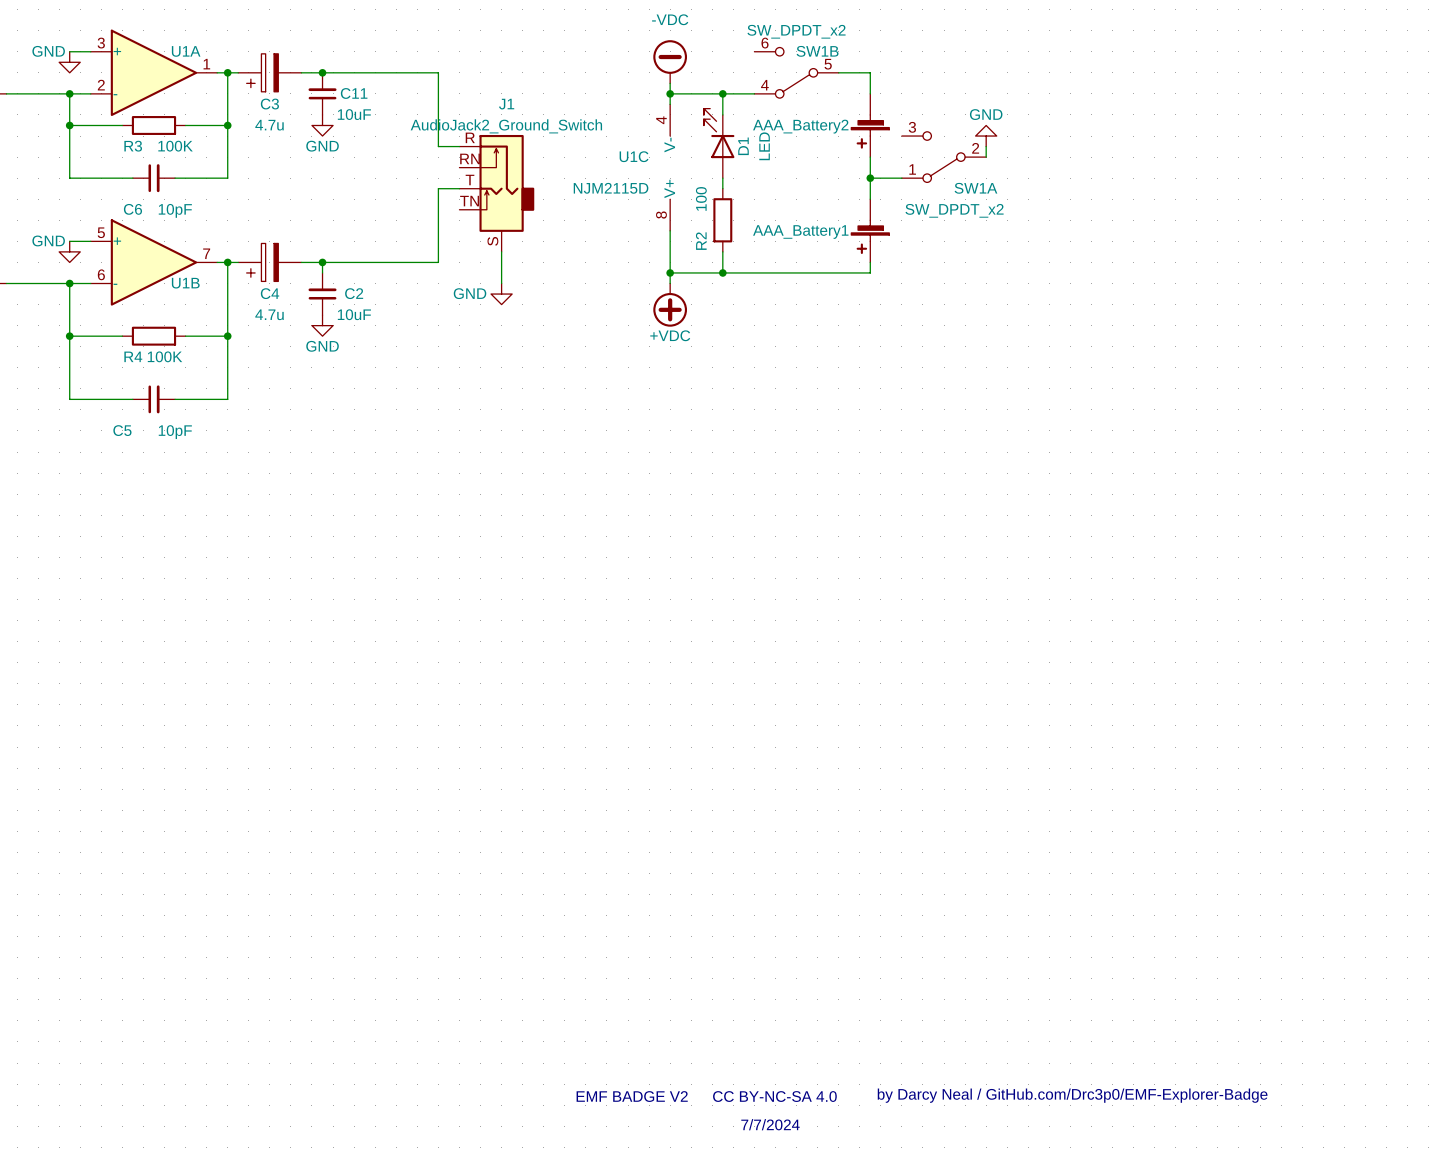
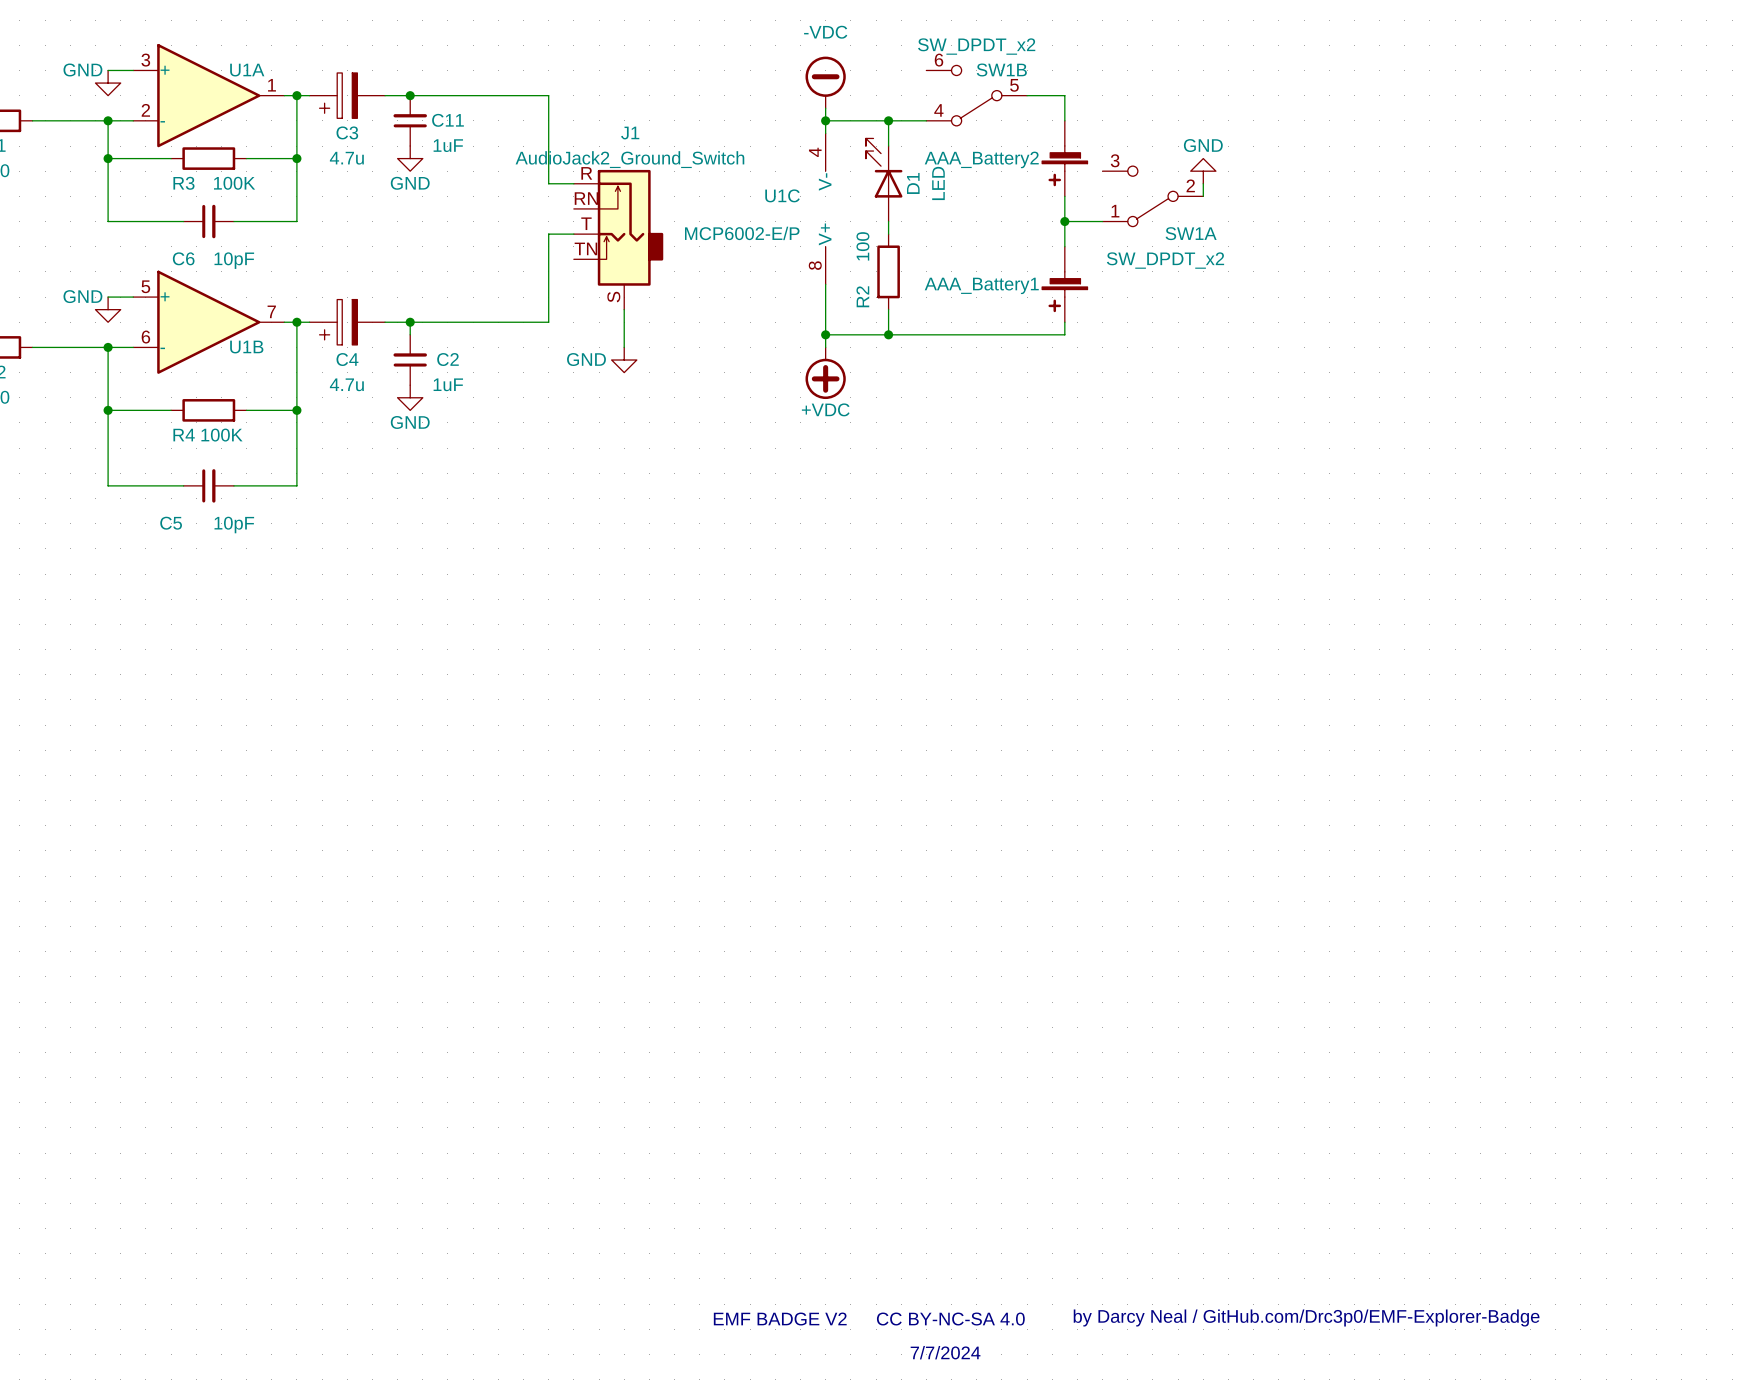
C11 value: 10uF (354, 114) -> 1uF (448, 145)
U1C value: NJM2115D (611, 188) -> MCP6002-E/P (742, 233)
C2 value: 10uF (354, 314) -> 1uF (448, 384)

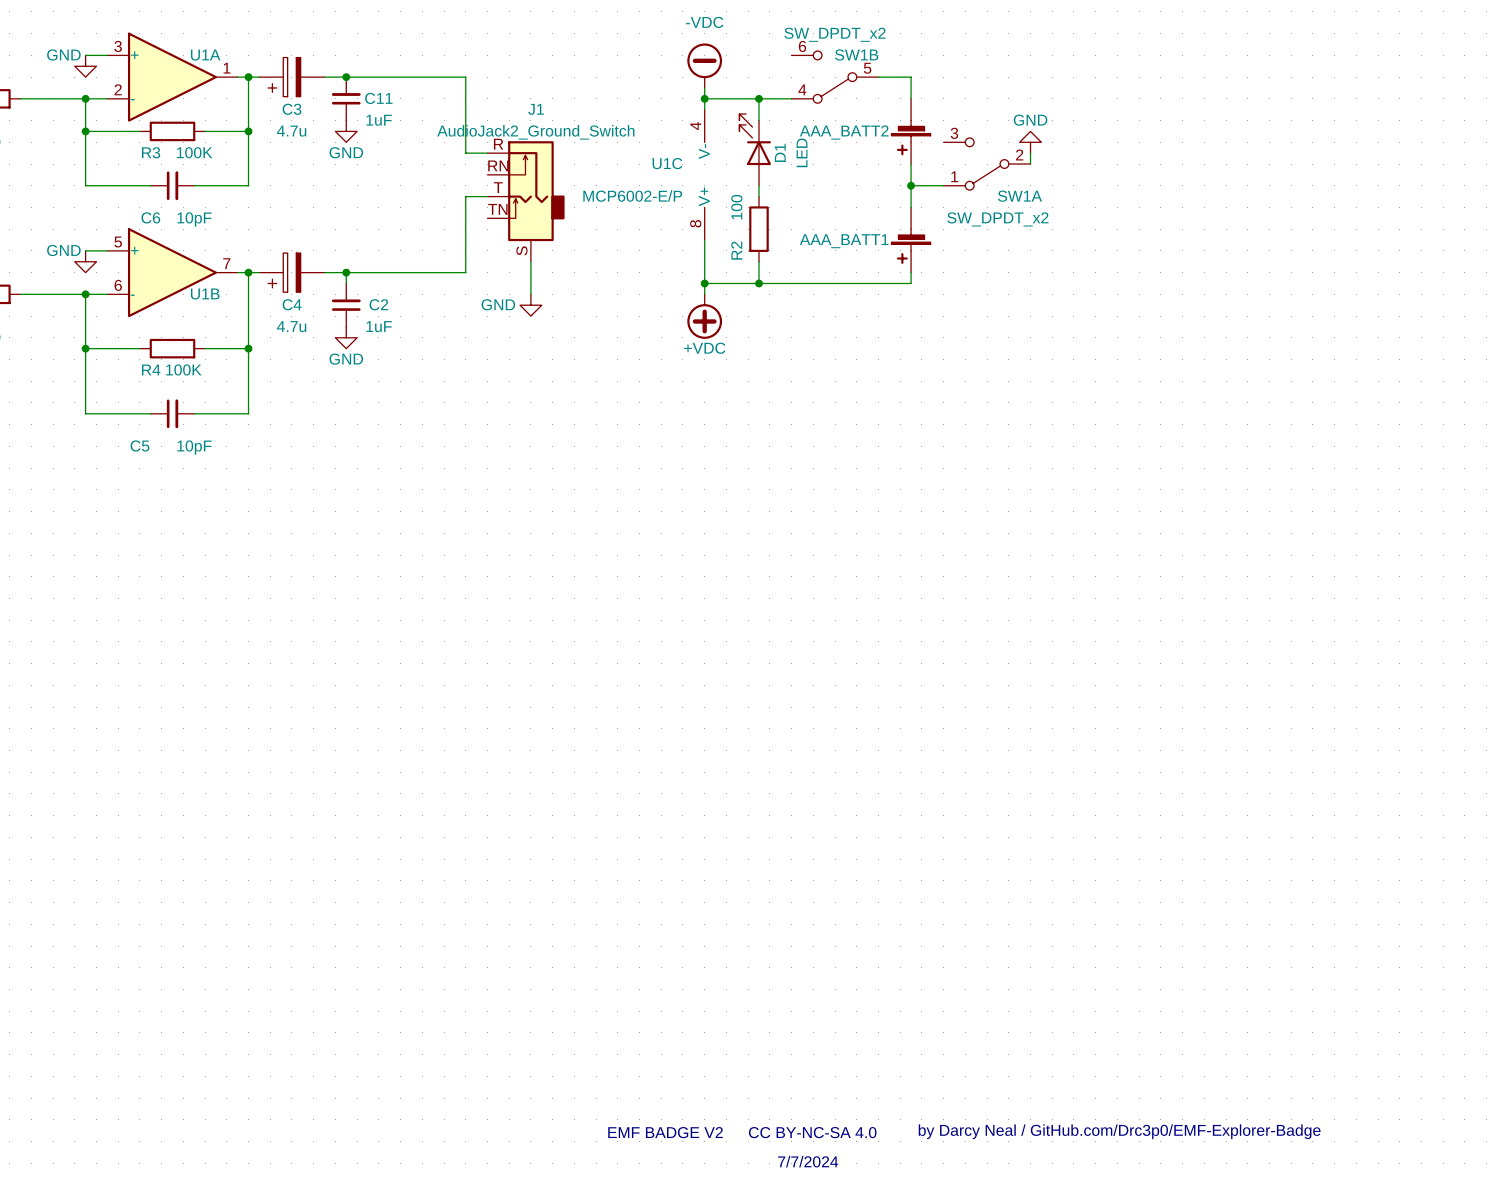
AAA_Battery2 name: AAA_Battery2 (981, 159) -> AAA_BATT2 (844, 132)
AAA_Battery1 name: AAA_Battery1 (981, 285) -> AAA_BATT1 (844, 241)

